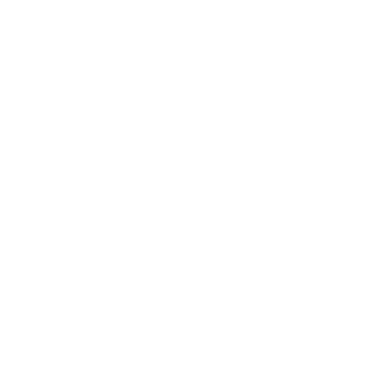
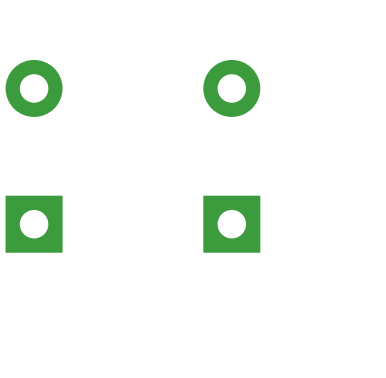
part: none -> (34, 156)
part: none -> (231, 156)

